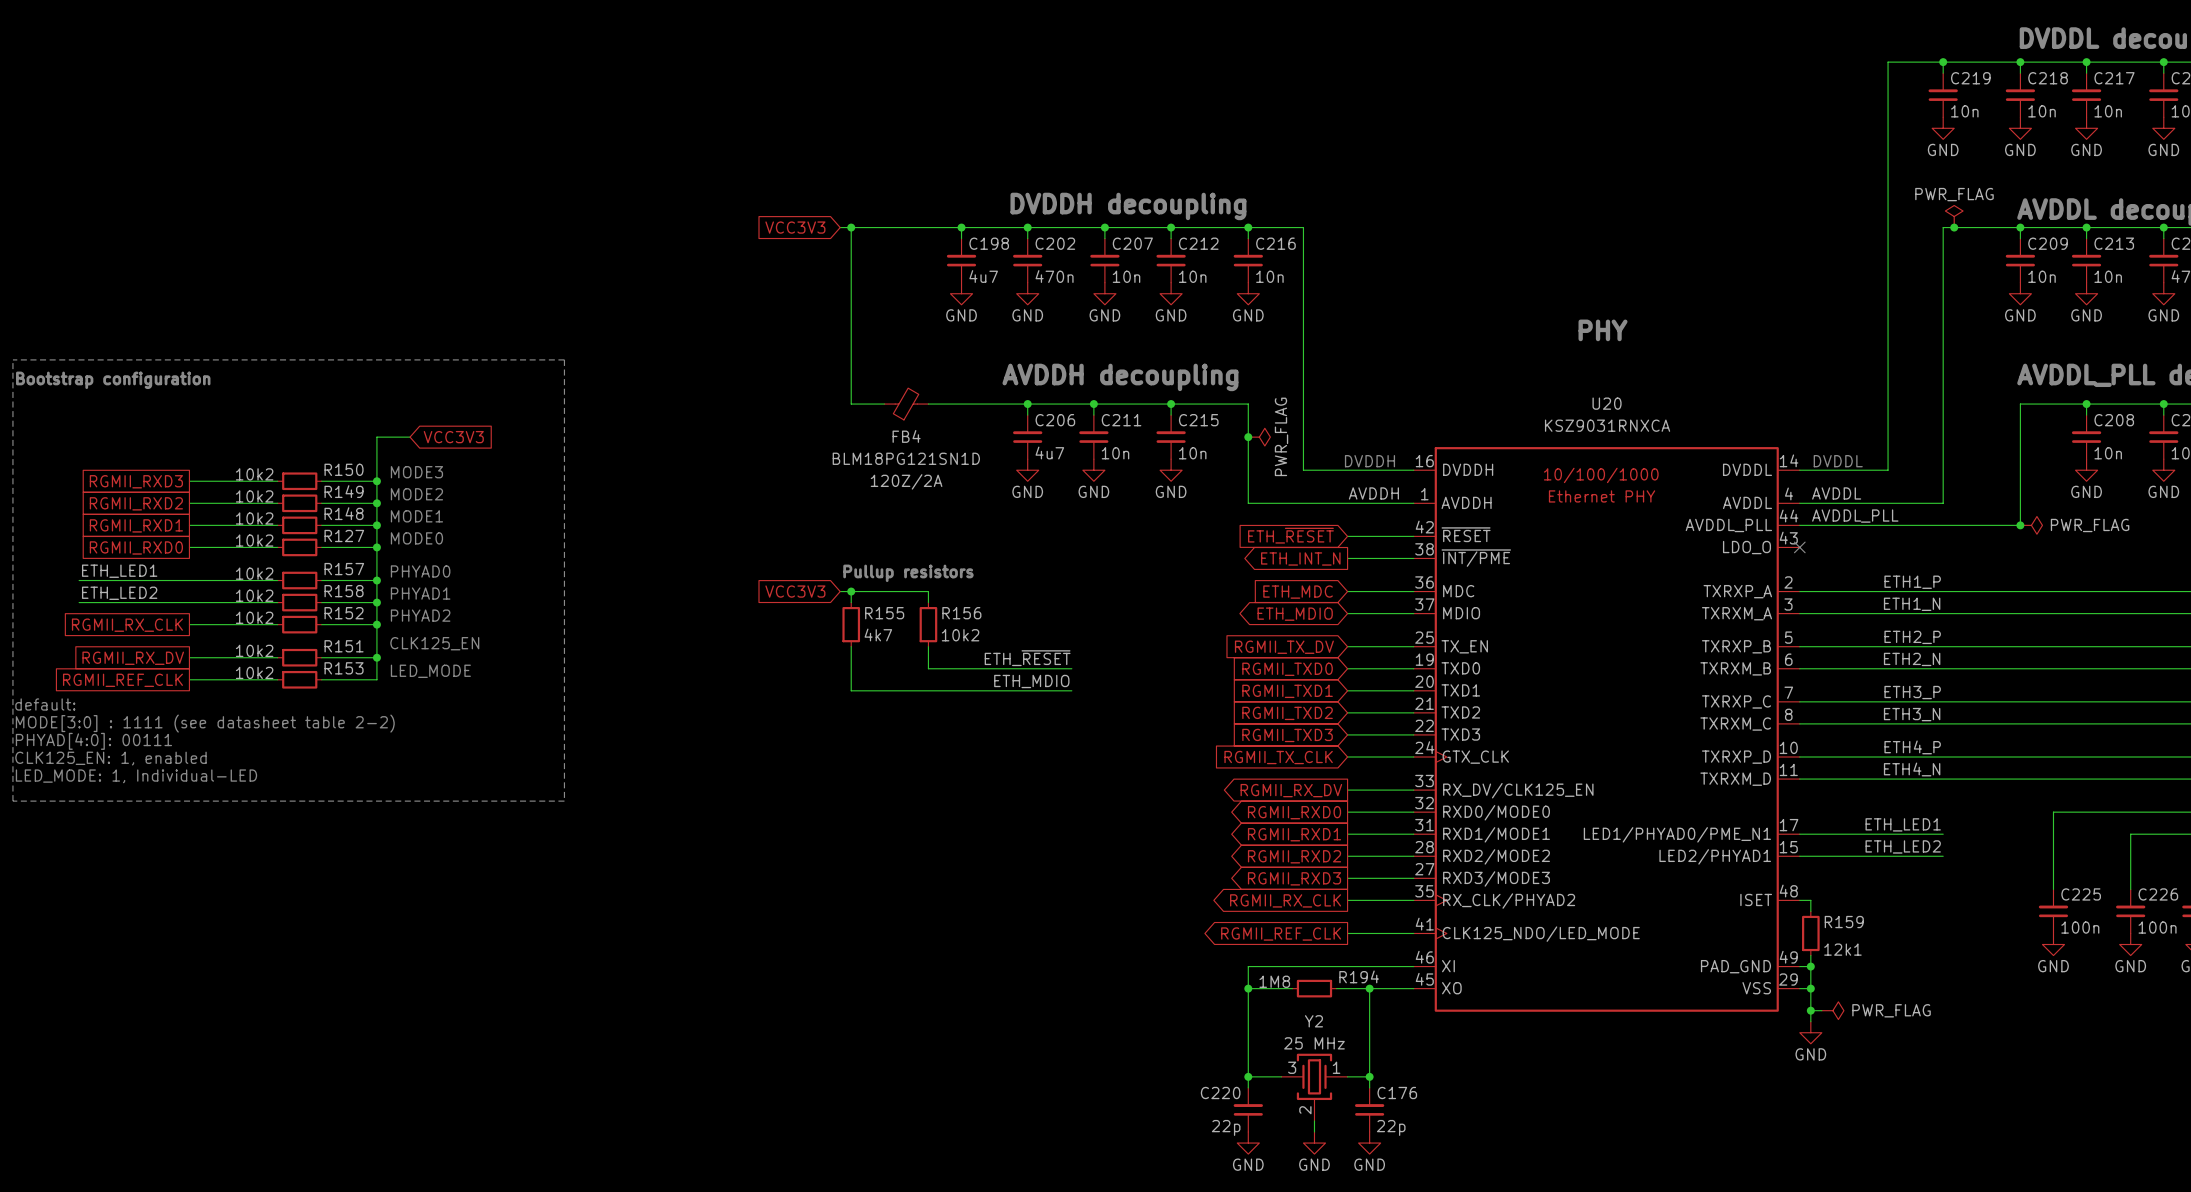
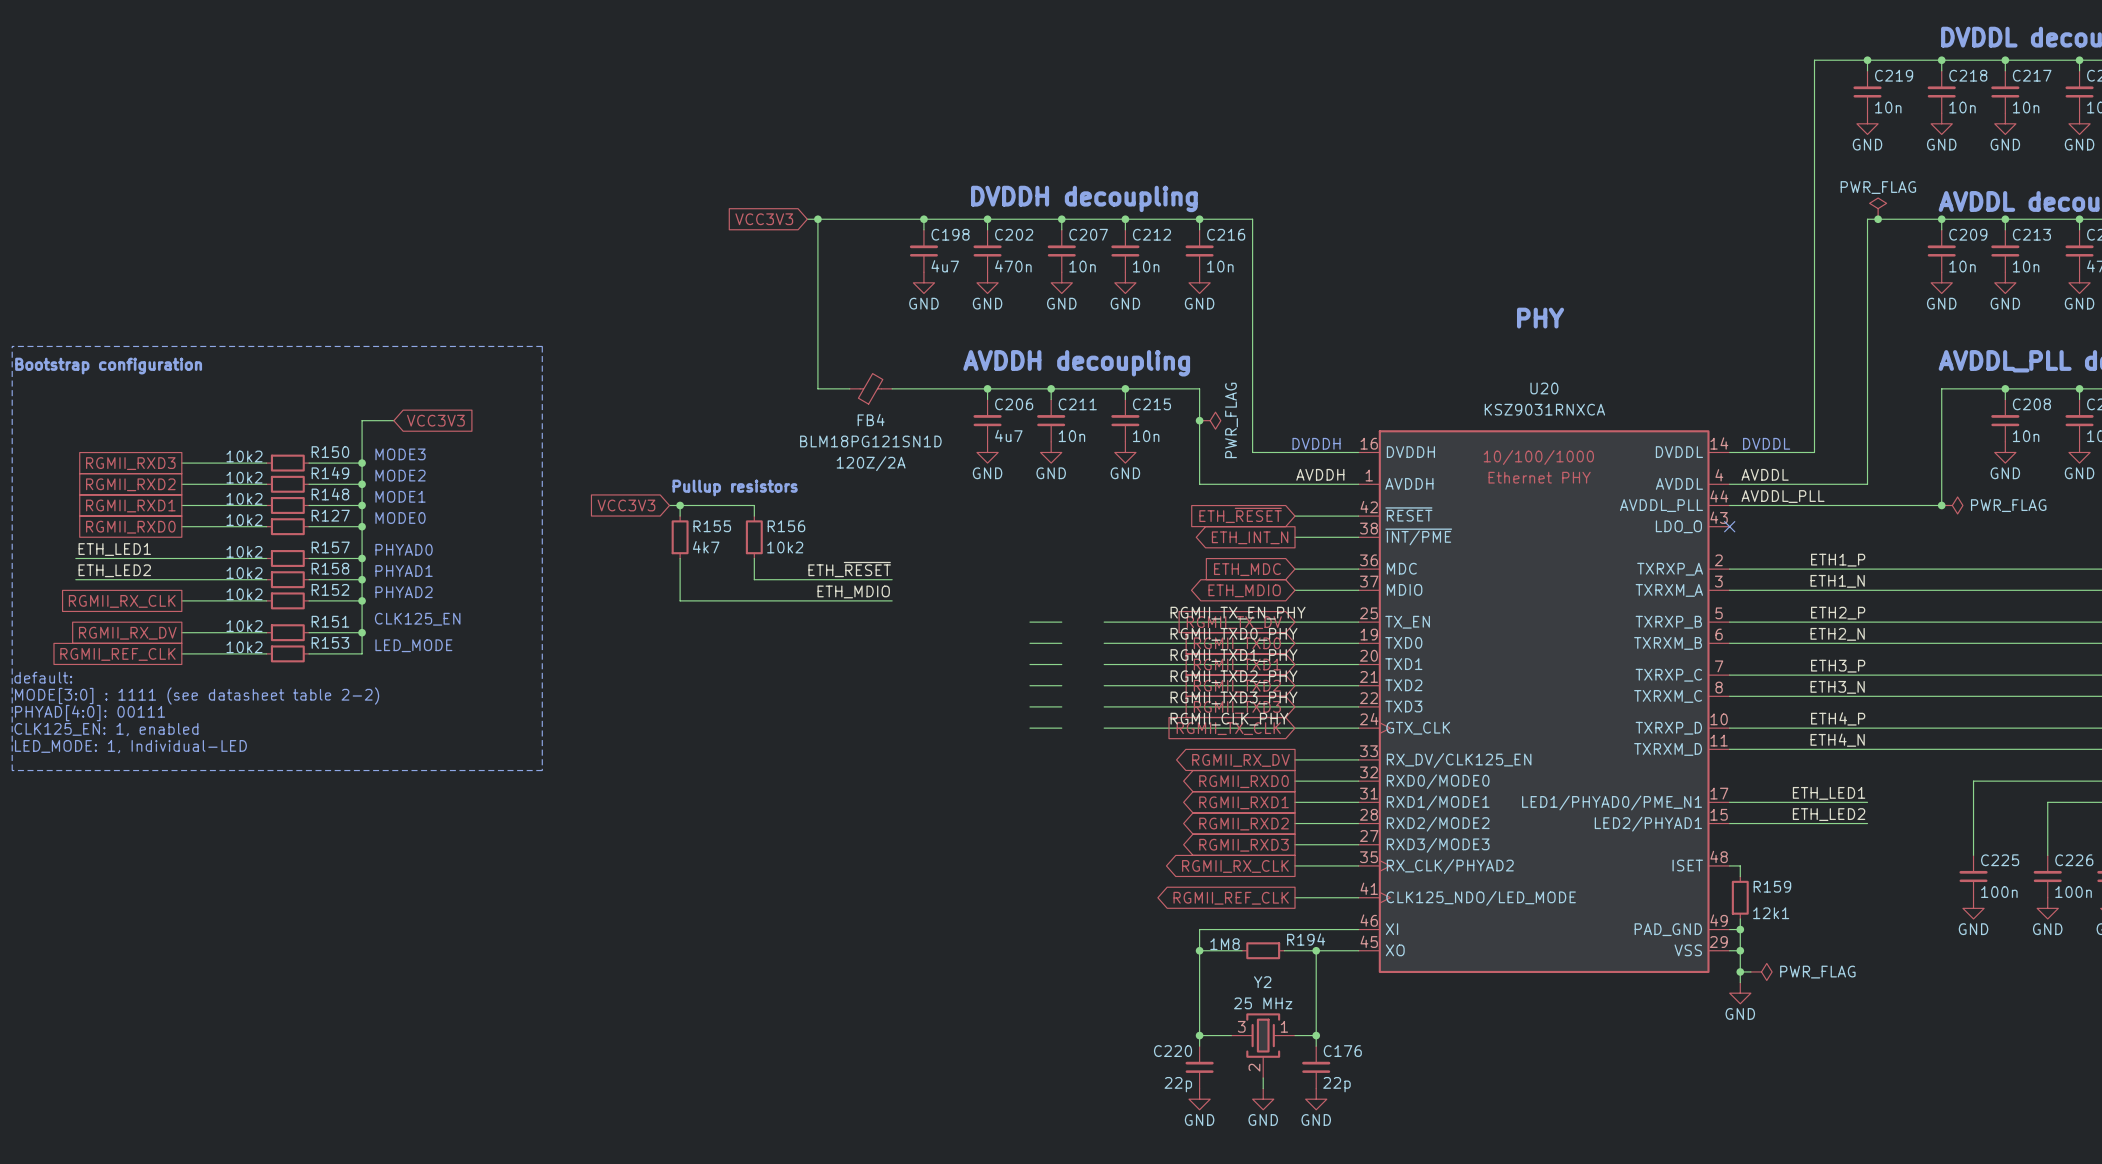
wire: none -> (669, 505) (754, 505) (754, 516)
junction: none -> (680, 505)
text position: Pullup resistors (908, 573) -> Pullup resistors (735, 487)
wire: none -> (680, 558) (680, 600) (892, 600)
global label position: VCC3V3 (795, 591) -> VCC3V3 (626, 505)
wire: (840, 591) (928, 591) (928, 602) -> (754, 558) (754, 579) (892, 579)
wire: (851, 591) (851, 602) -> (680, 505) (680, 516)
junction: (851, 591) -> none
R155 position: (851, 624) -> (680, 537)
R156 position: (928, 624) -> (754, 537)
label: none -> RGMII_TX_EN_PHY (1238, 613)
wire: (851, 646) (851, 690) (1071, 690) -> (1061, 664) (1029, 664)
wire: (928, 646) (928, 668) (1071, 668) -> (1061, 643) (1029, 643)
wire: none -> (1029, 622) (1061, 622)
wire: none -> (1104, 622) (1295, 622)
label position: ETH_~{RESET} (1027, 658) -> ETH_~{RESET} (849, 569)
label: none -> RGMII_TXD0_PHY (1234, 634)
wire: none -> (1104, 643) (1295, 643)
label position: ETH_MDIO (1031, 681) -> ETH_MDIO (853, 591)
label: none -> RGMII_TXD1_PHY (1234, 655)
wire: none -> (1104, 664) (1295, 664)
label: none -> RGMII_TXD2_PHY (1234, 676)
wire: none -> (1029, 685) (1061, 685)
wire: none -> (1104, 685) (1295, 685)
label: none -> RGMII_TXD3_PHY (1234, 697)
wire: none -> (1029, 706) (1061, 706)
wire: none -> (1104, 706) (1295, 706)
label: none -> RGMII_CLK_PHY (1229, 719)
wire: none -> (1029, 728) (1061, 728)
wire: none -> (1104, 728) (1295, 728)

